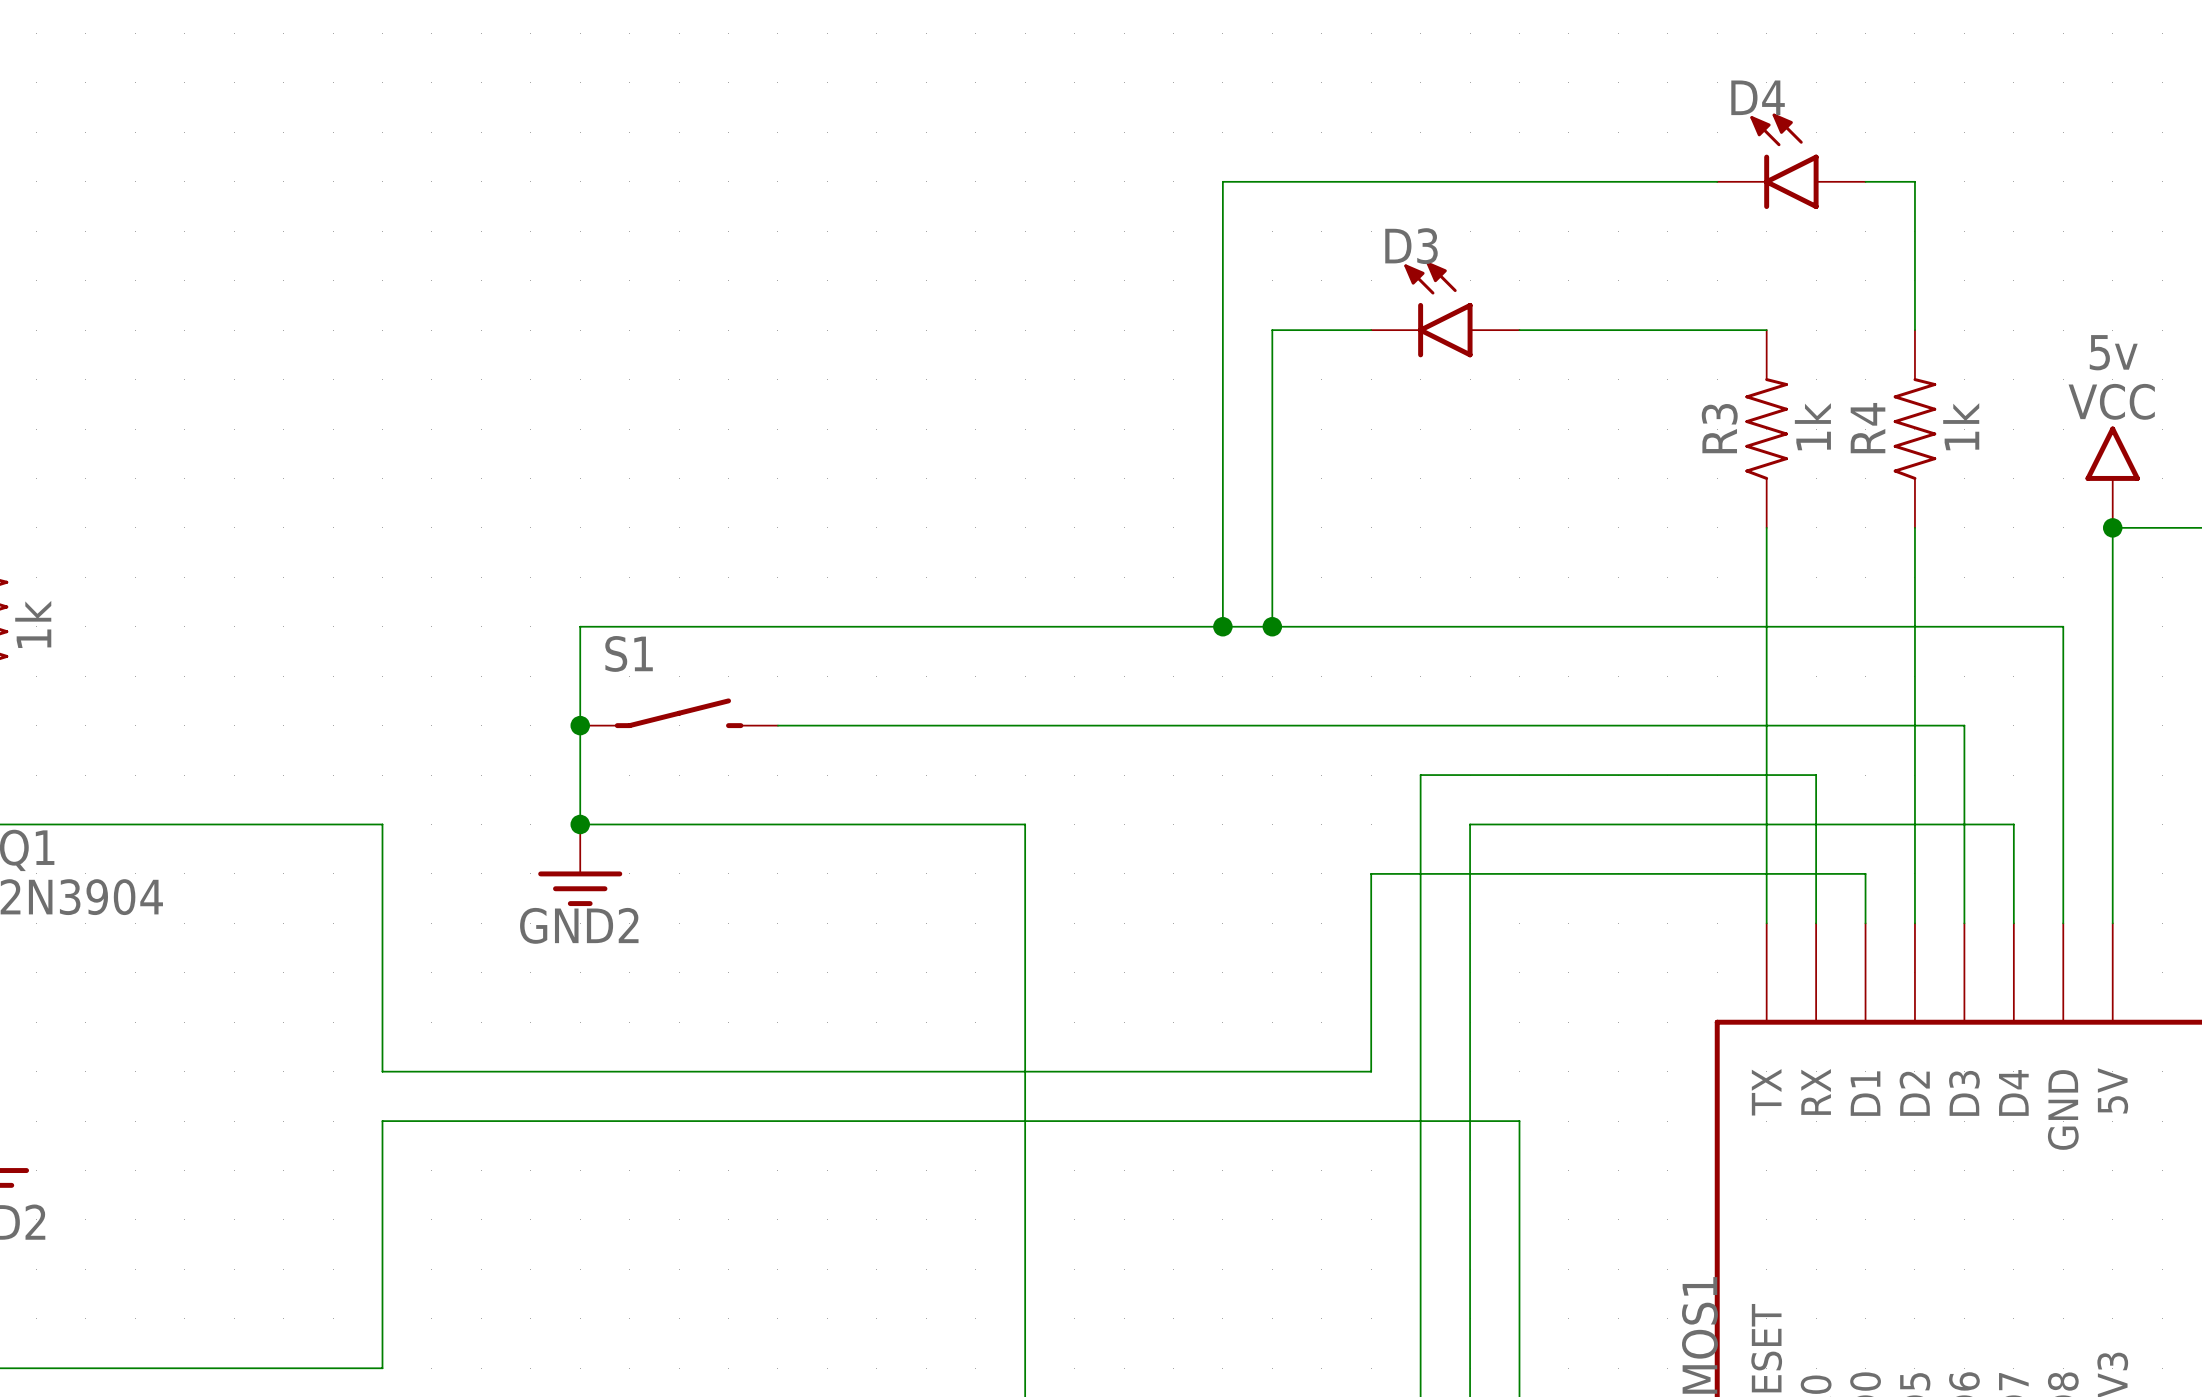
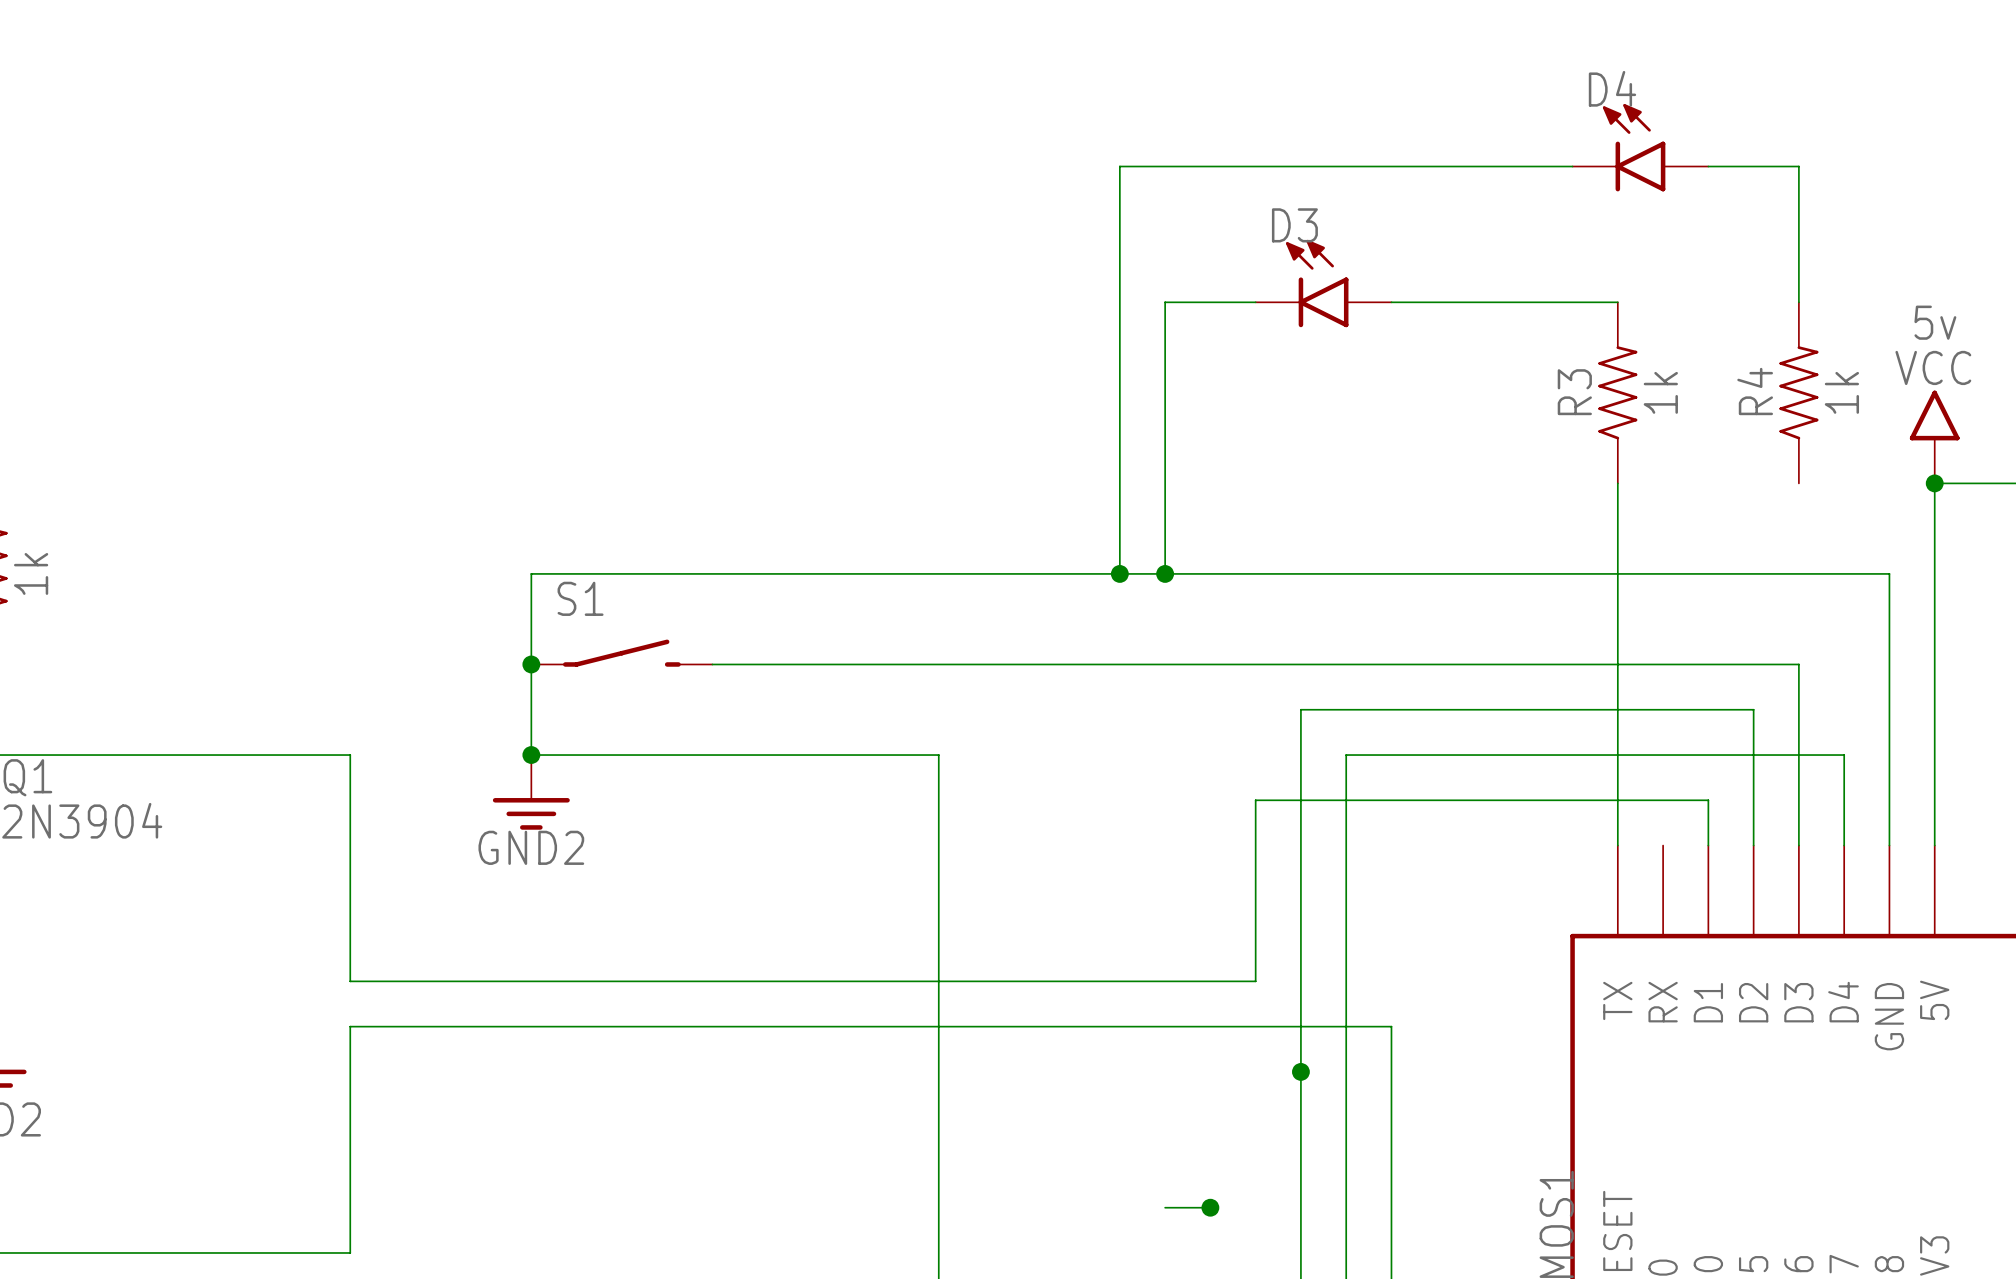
wire: (1914, 181) (1914, 330) -> (1753, 166) (1798, 166) (1798, 302)
R4 position: (1914, 429) -> (1798, 392)
wire: (1914, 527) (1914, 775) -> none
wire: (1816, 775) (1816, 923) -> (1663, 709) (1753, 709)
junction: none -> (1300, 1071)
wire: none -> (1165, 1207) (1210, 1207)
junction: none -> (1210, 1207)

